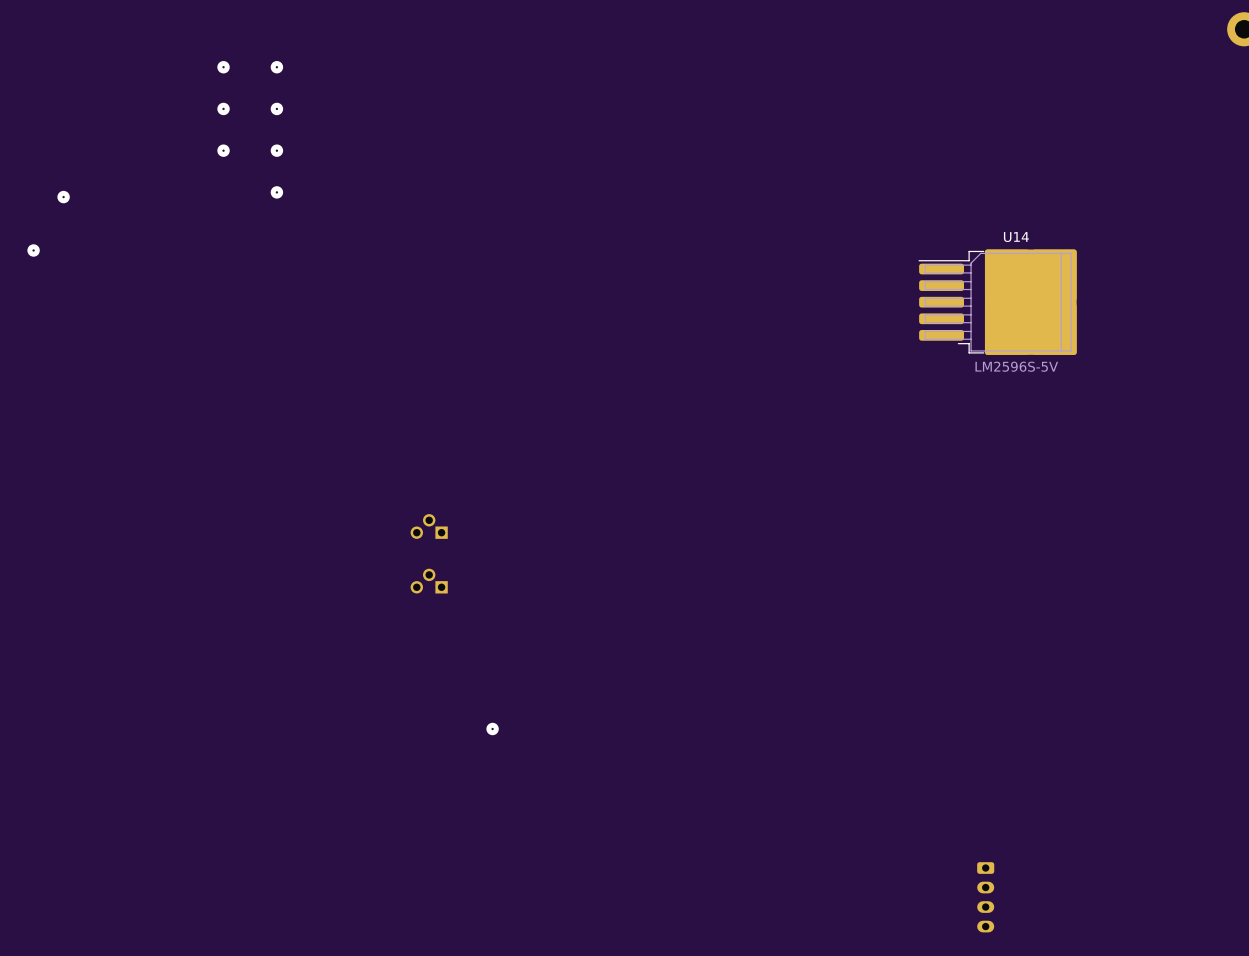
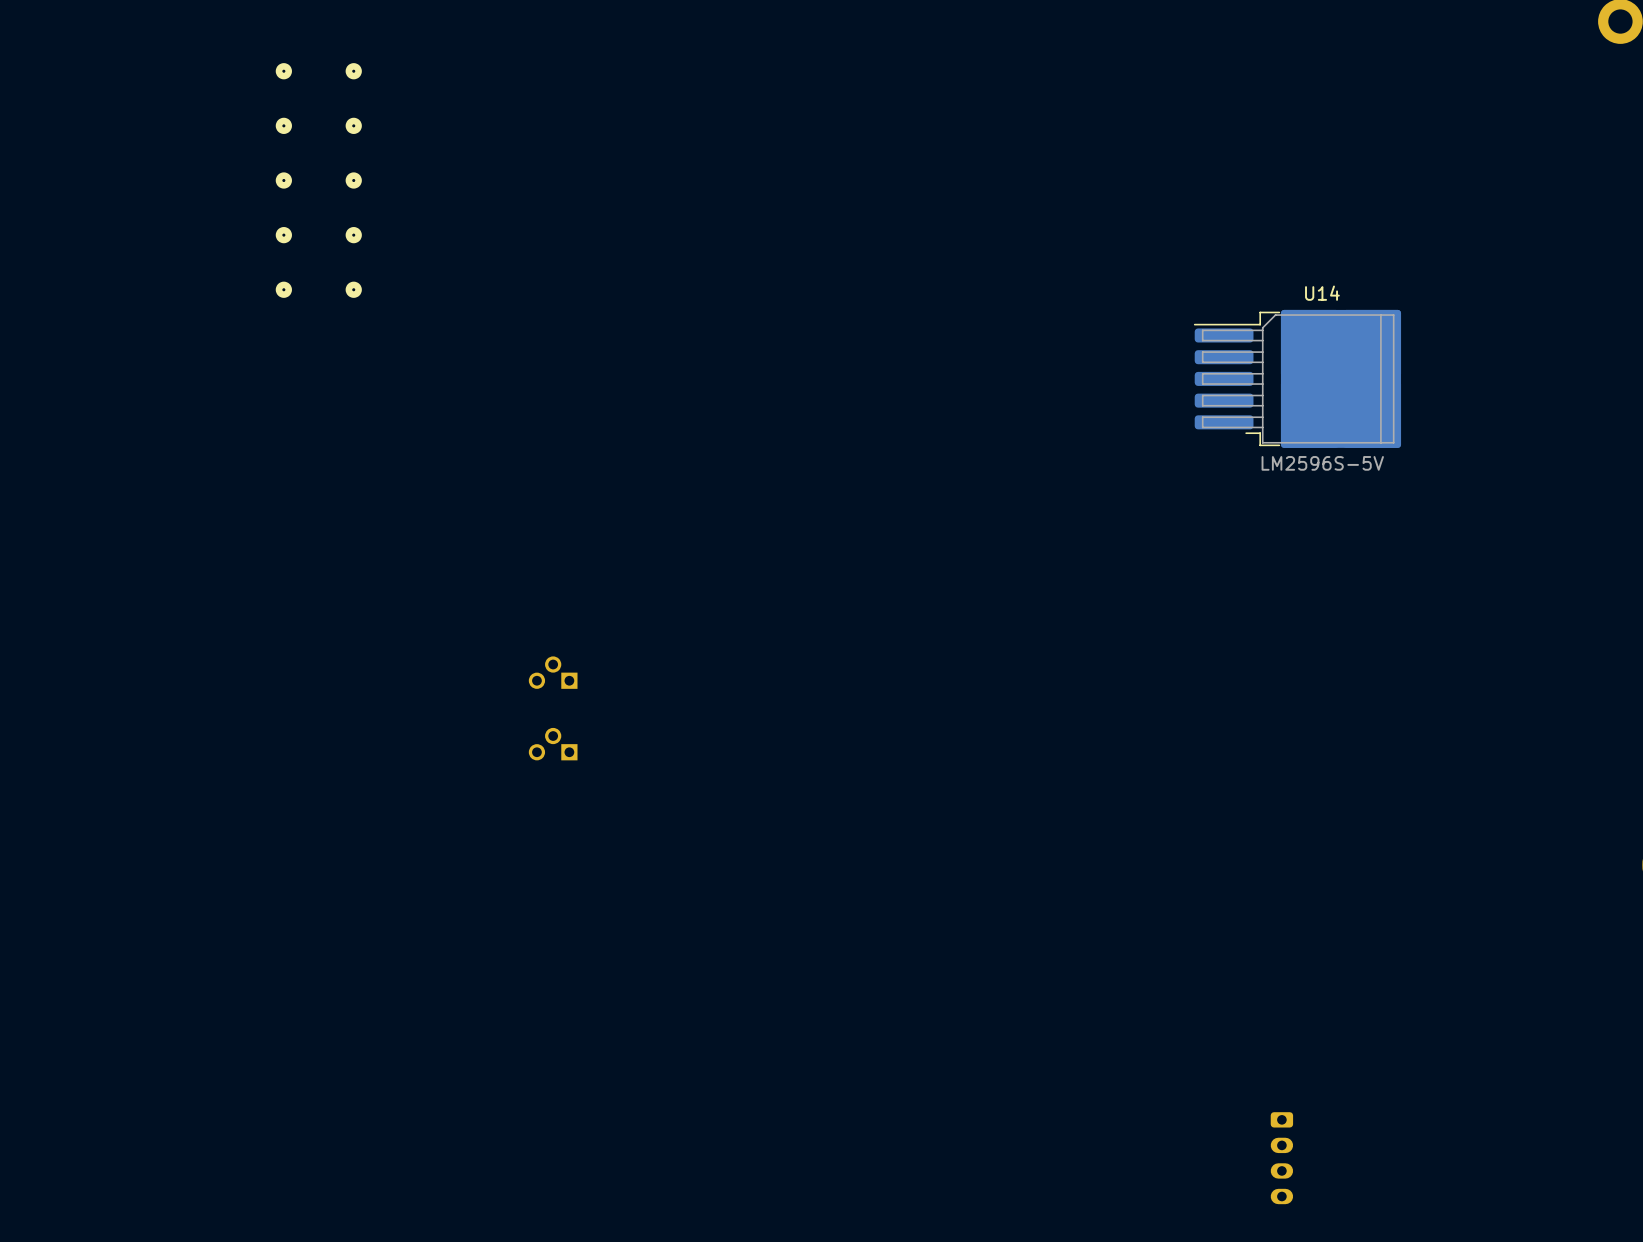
part: none -> (283, 235)
part: (63, 197) -> none
part: none -> (283, 289)
part: none -> (353, 289)
part: (33, 250) -> none
part: (492, 729) -> none

